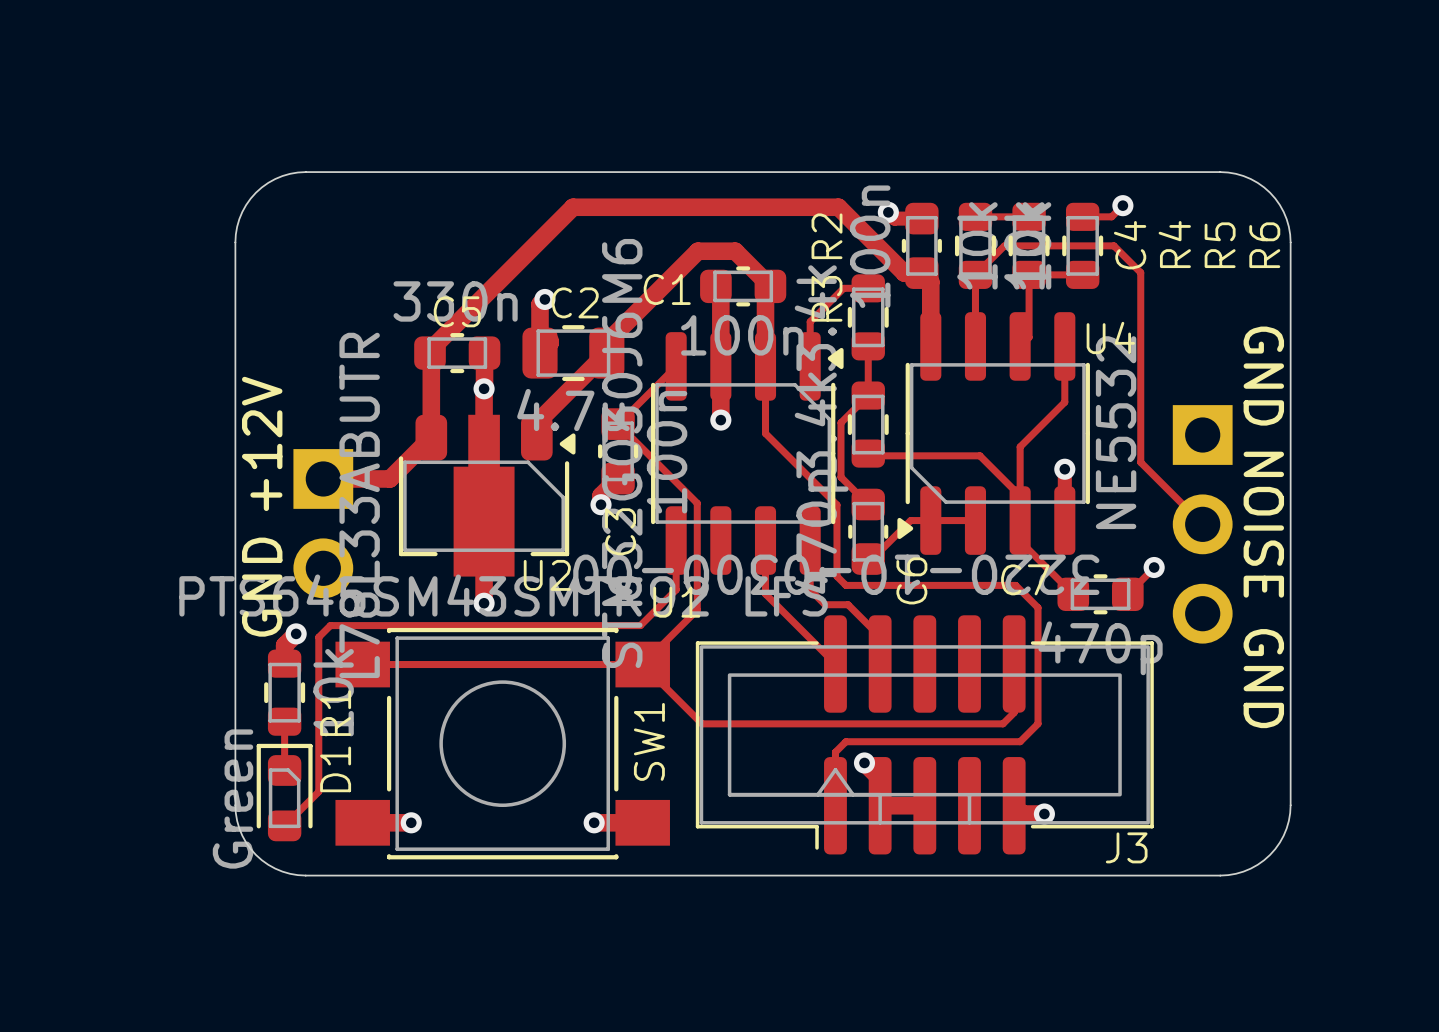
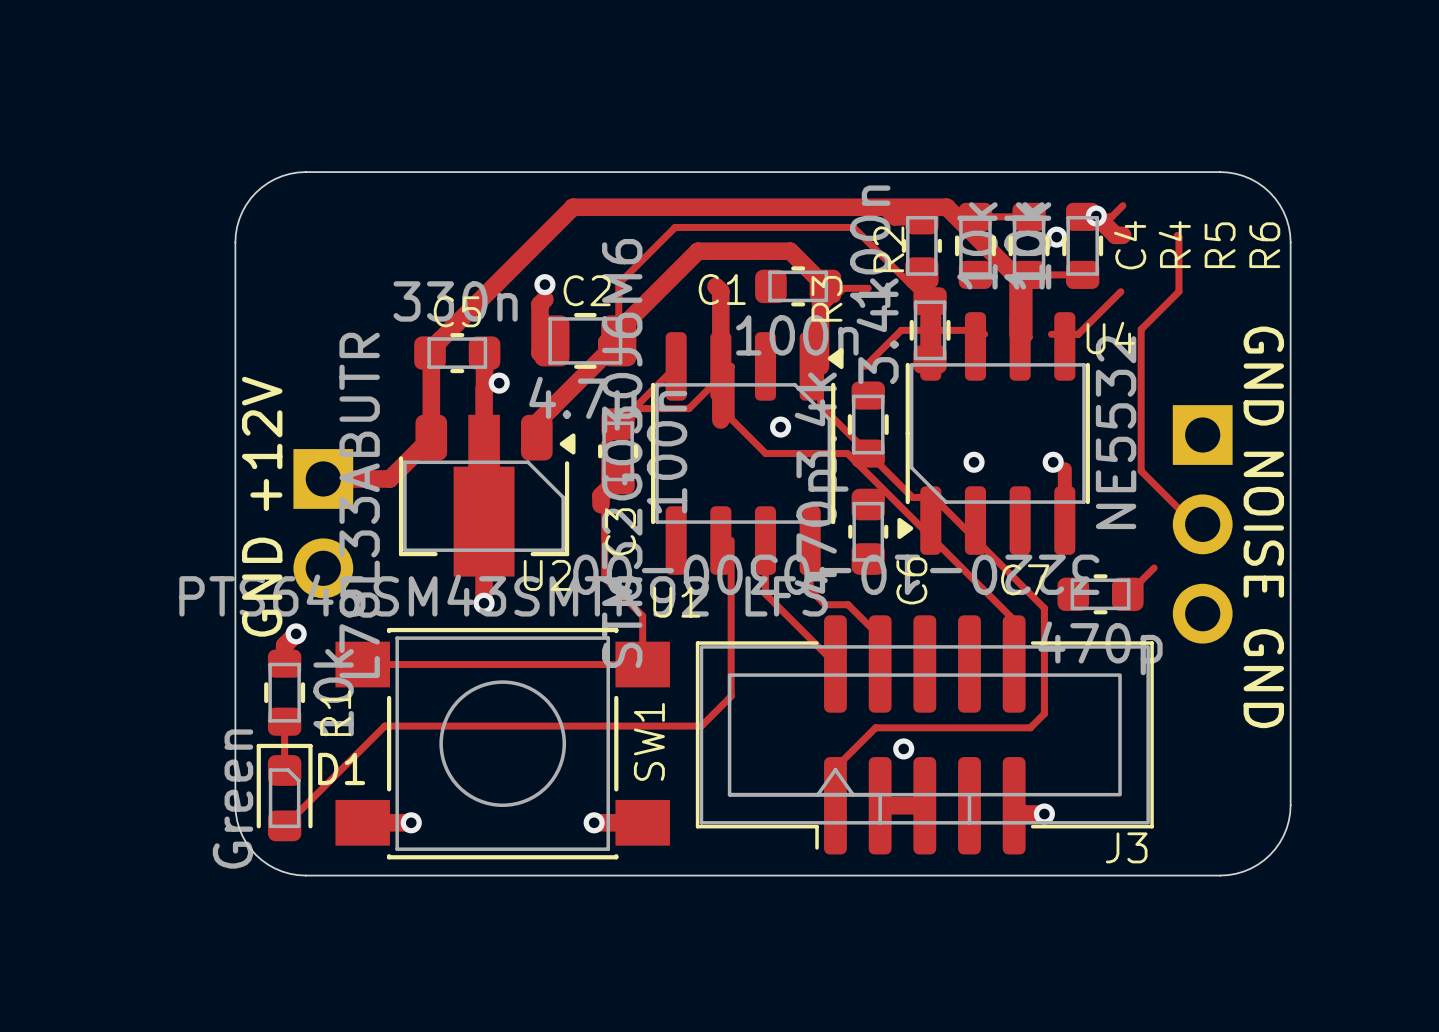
via position: (1122, 205) -> (1096, 216)
track: (838, 207) (904, 273) (921, 273) (930, 282) (930, 346) -> (838, 207) (946, 207) (1018, 278) (1018, 334)
via: (888, 212) -> none
track: none -> (1096, 216) (1115, 235) (1122, 235)
via: none -> (1056, 237)
track: (735, 251) (770, 286) (765, 291) (765, 433) (836, 504) (836, 576) (845, 585) (1015, 585) (1038, 607) (1038, 723) (1020, 741) (845, 741) (835, 752) (835, 767) -> (735, 251) (790, 251) (825, 286) (820, 291) (820, 405) (912, 497) (933, 497) (1044, 608) (1044, 713) (1030, 727) (875, 727) (835, 767)
C1 position: (743, 286) -> (798, 286)
track: none -> (1120, 291) (1078, 334) (1051, 334)
via position: (544, 299) -> (544, 284)
track: none -> (930, 301) (927, 301) (853, 227) (675, 227) (618, 283) (618, 340) (618, 330)
R2 position: (868, 317) -> (930, 330)
track: none -> (984, 334) (980, 330) (901, 330) (865, 366)
track: (868, 346) (868, 395) (840, 422) (840, 477) (868, 504) -> none
track: (975, 346) (975, 274) (1004, 245) (1113, 245) (1140, 272) (1140, 462) (1202, 524) -> (1177, 235) (1178, 237) (1178, 291) (1141, 329) (1141, 471) (1194, 524) (1202, 524)
track: (1064, 346) (1064, 402) (1020, 446) (1020, 541) (1073, 594) -> none
C2 position: (573, 353) -> (585, 340)
via position: (484, 388) -> (499, 383)
via position: (720, 420) -> (780, 427)
track: (618, 424) (697, 503) (697, 609) (642, 664) (702, 723) (1003, 723) (1014, 712) (1014, 663) -> (642, 664) (642, 615) (604, 577) (604, 443) (639, 408) (688, 408) (731, 366) (731, 418) (765, 453) (847, 453) (1014, 620) (1014, 663)
track: (868, 453) (870, 455) (979, 455) (1020, 496) -> none
via: none -> (974, 462)
via position: (1064, 469) -> (1053, 462)
via: (601, 504) -> none
track: (975, 520) (910, 520) (872, 559) (868, 559) -> none
track: (676, 540) (676, 589) (640, 625) (330, 625) (318, 637) (318, 791) -> (731, 540) (731, 696) (701, 726) (384, 726) (318, 791)
via: (1154, 567) -> none
via position: (864, 762) -> (903, 748)
D1 name rotation: 0° (335, 769) -> 90° clockwise (341, 768)

